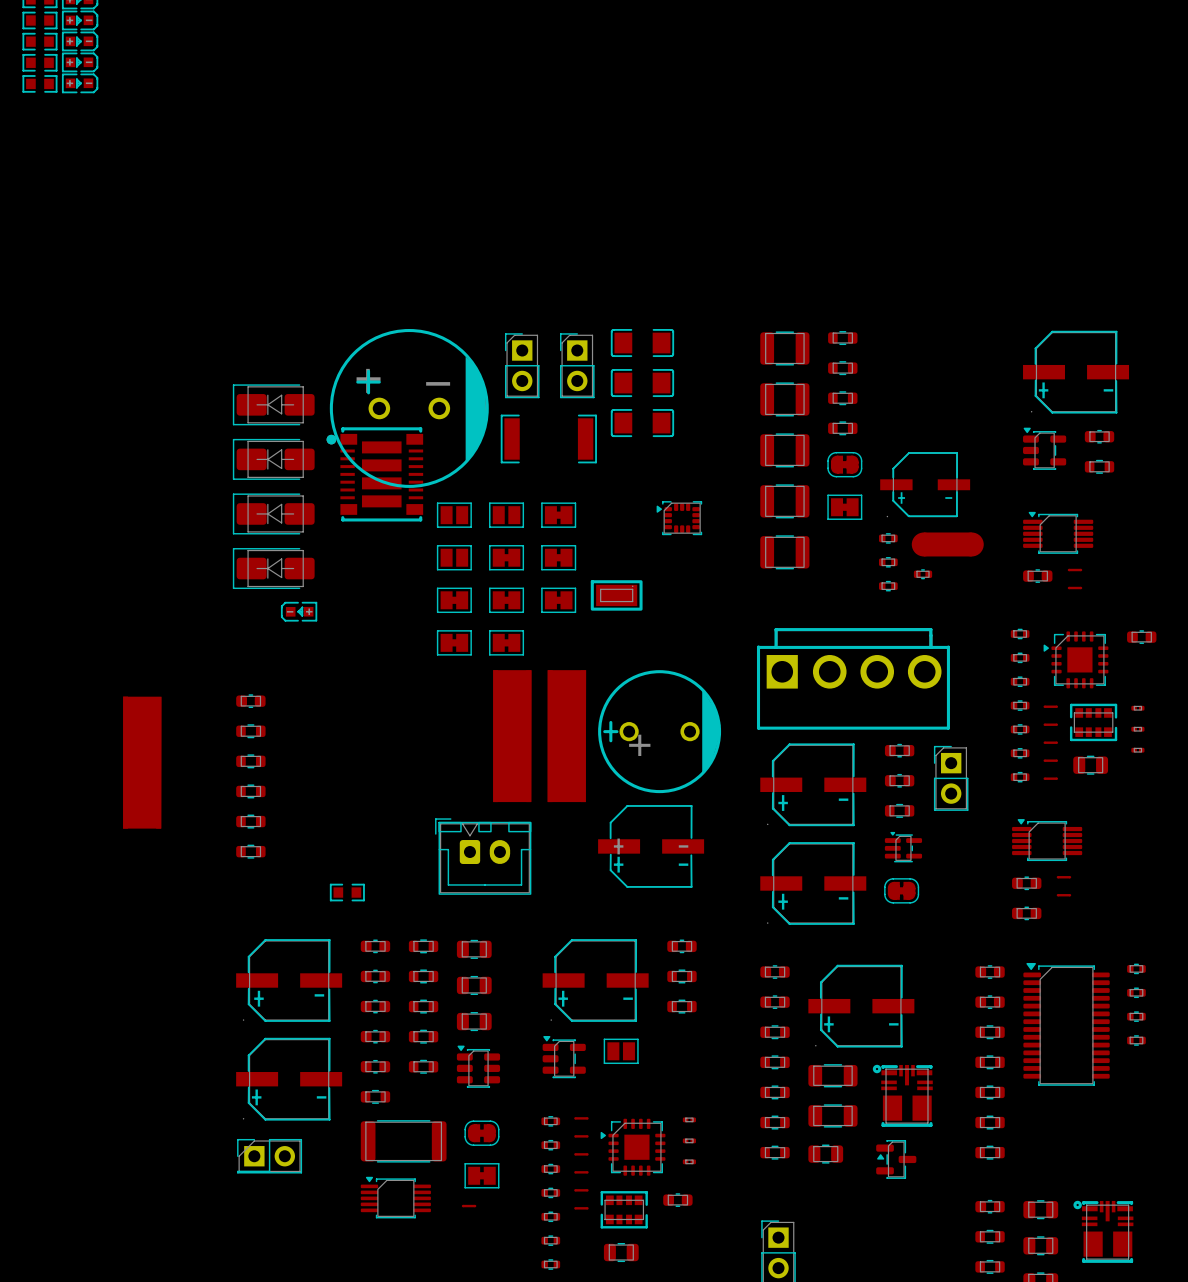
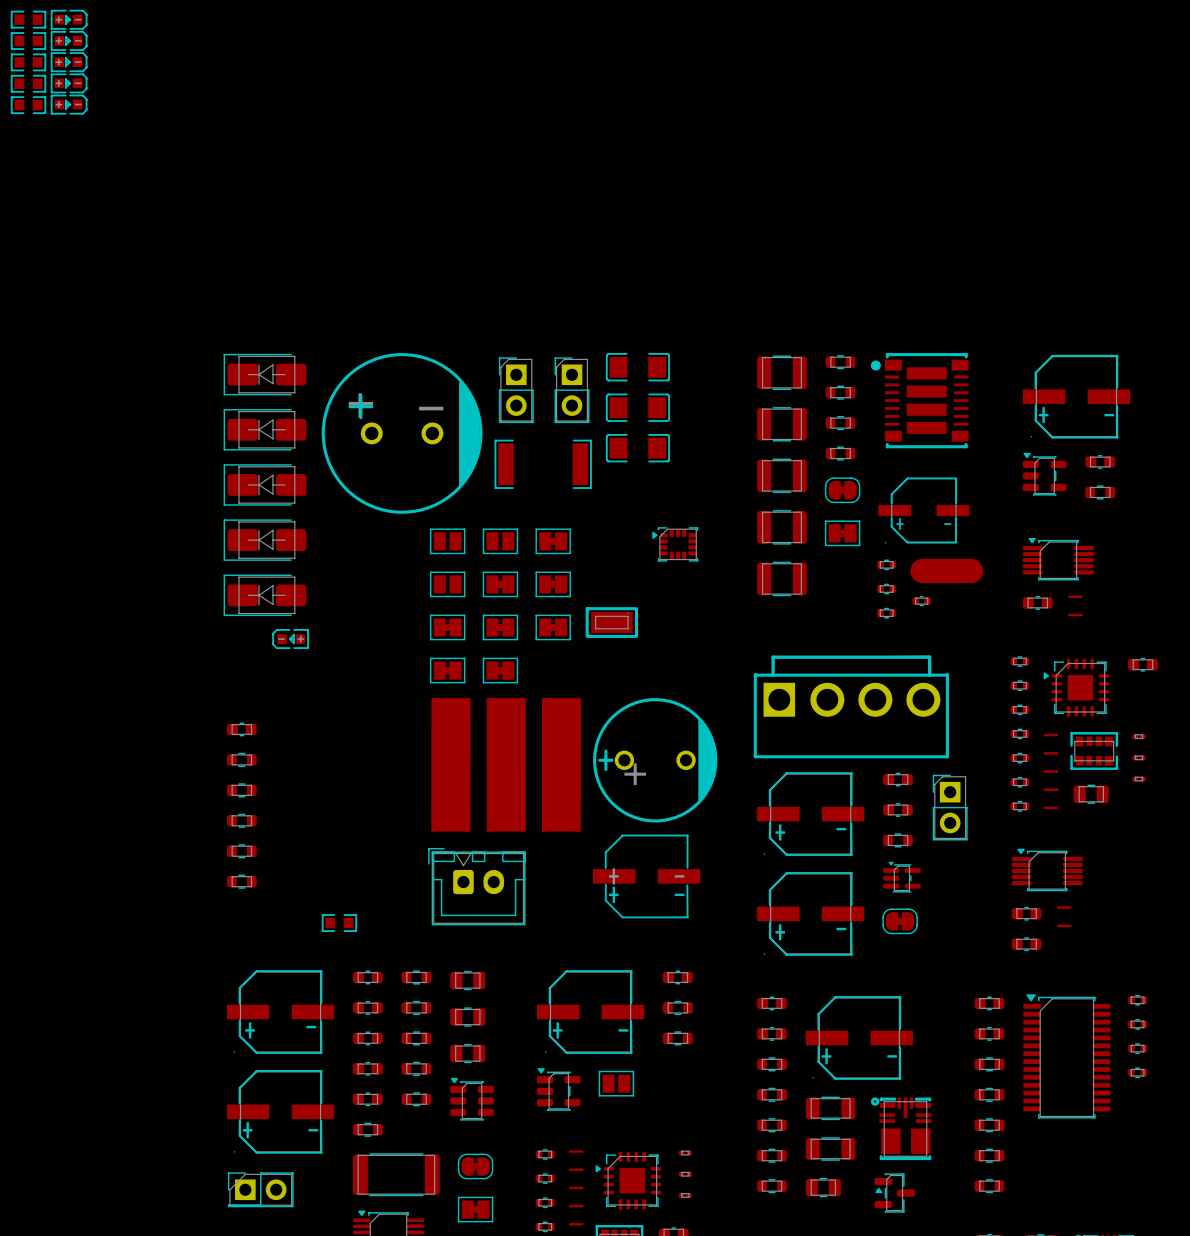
part: none -> (264, 374)
part: none -> (919, 400)
part: (374, 474) -> none
part: none -> (451, 764)
part: (142, 762) -> none

